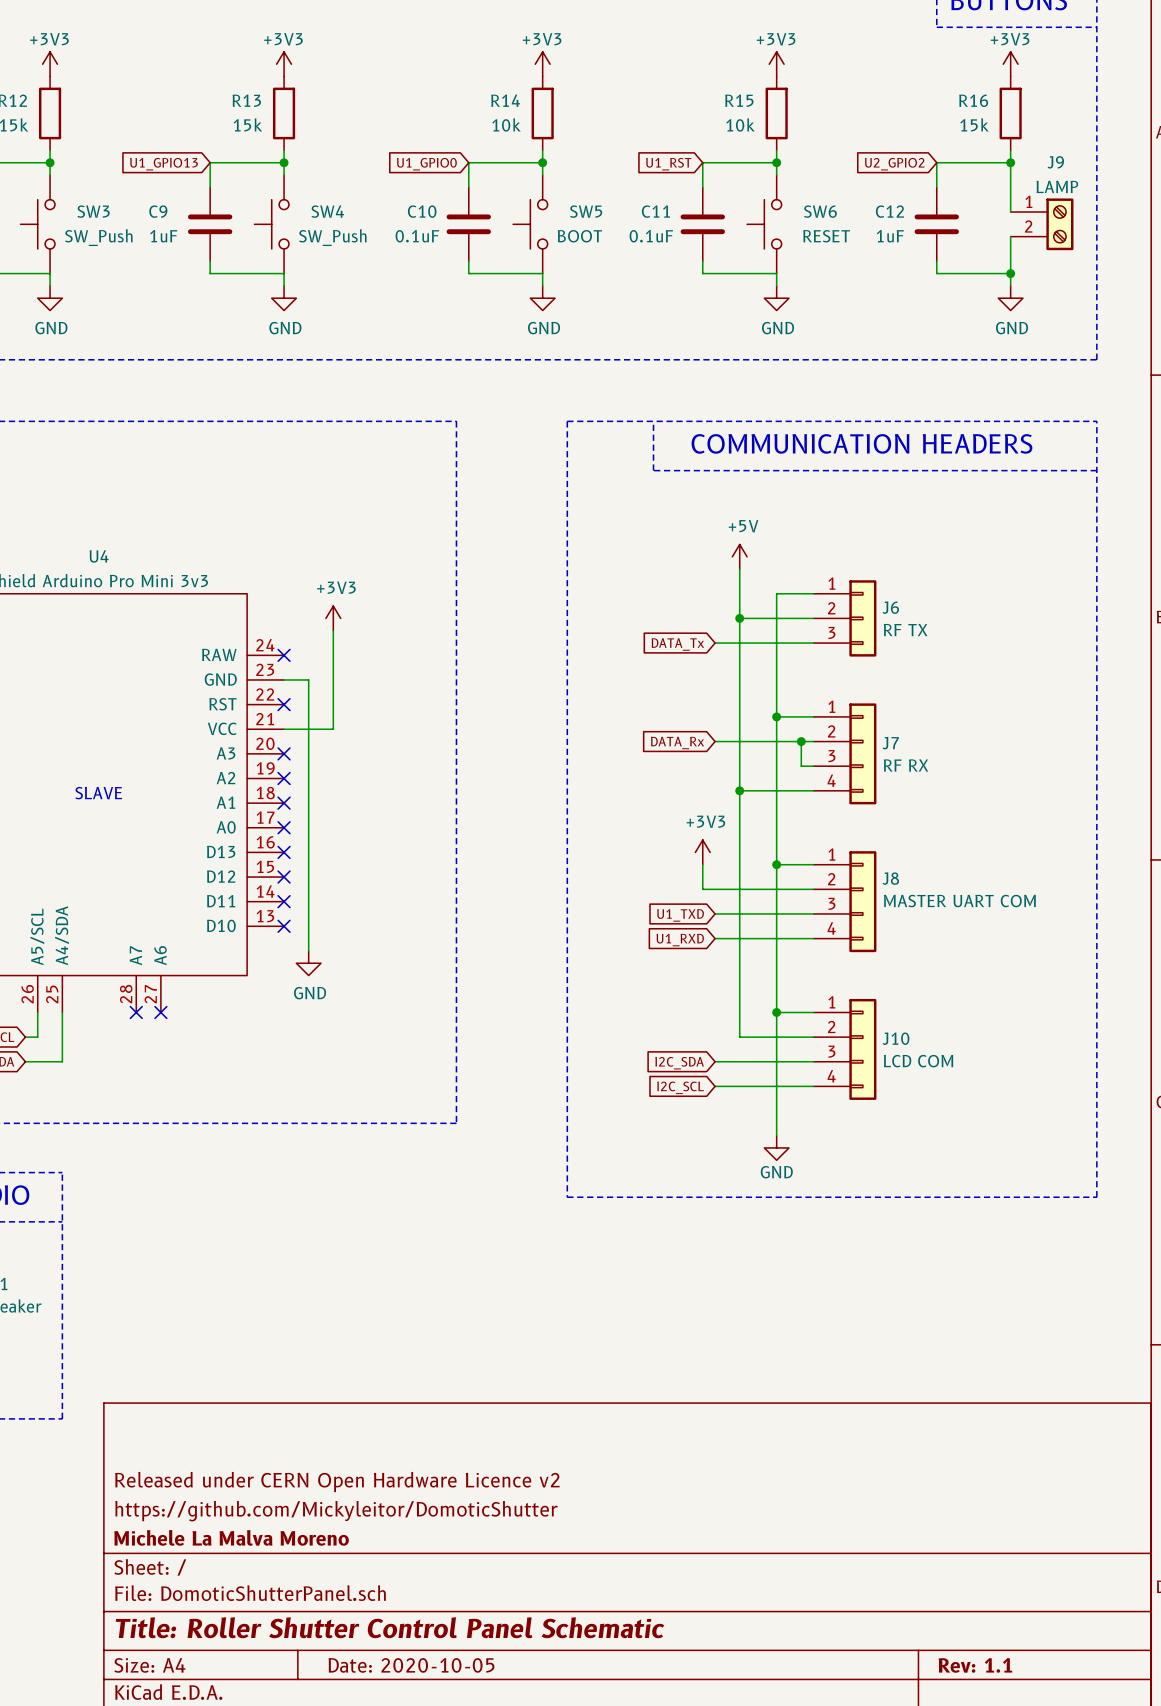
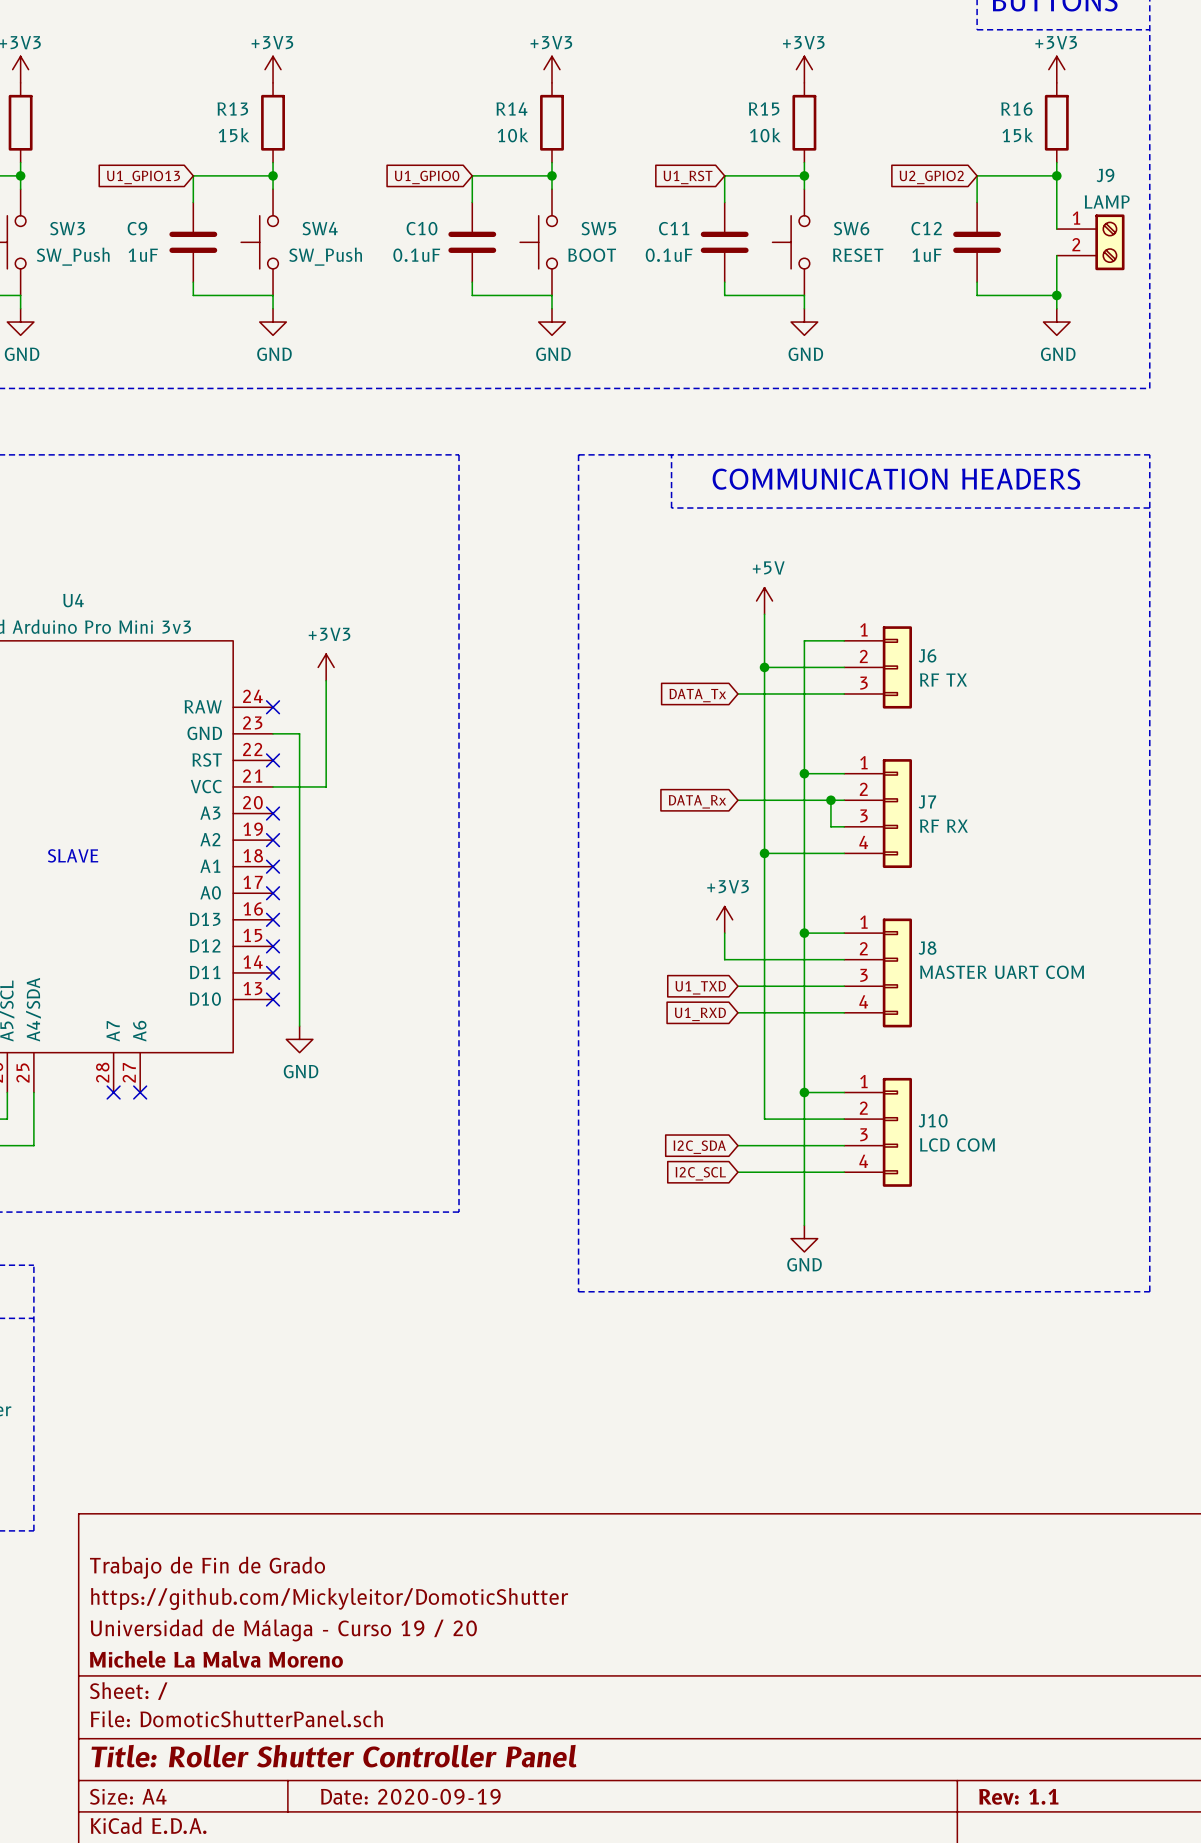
title block: none -> Trabajo de Fin de Grado (207, 1567)
title block: Released under CERN Open Hardware Licence v2 (337, 1482) -> https://github.com/Mickyleitor/DomoticShutter (329, 1599)
title block: https://github.com/Mickyleitor/DomoticShutter (336, 1511) -> Universidad de Málaga - Curso 19 / 20 (283, 1630)
title block: Title: Roller Shutter Control Panel Schematic (390, 1627) -> Title: Roller Shutter Controller Panel (333, 1756)
title block: Date: 2020-10-05 (411, 1665) -> Date: 2020-09-19 (410, 1796)

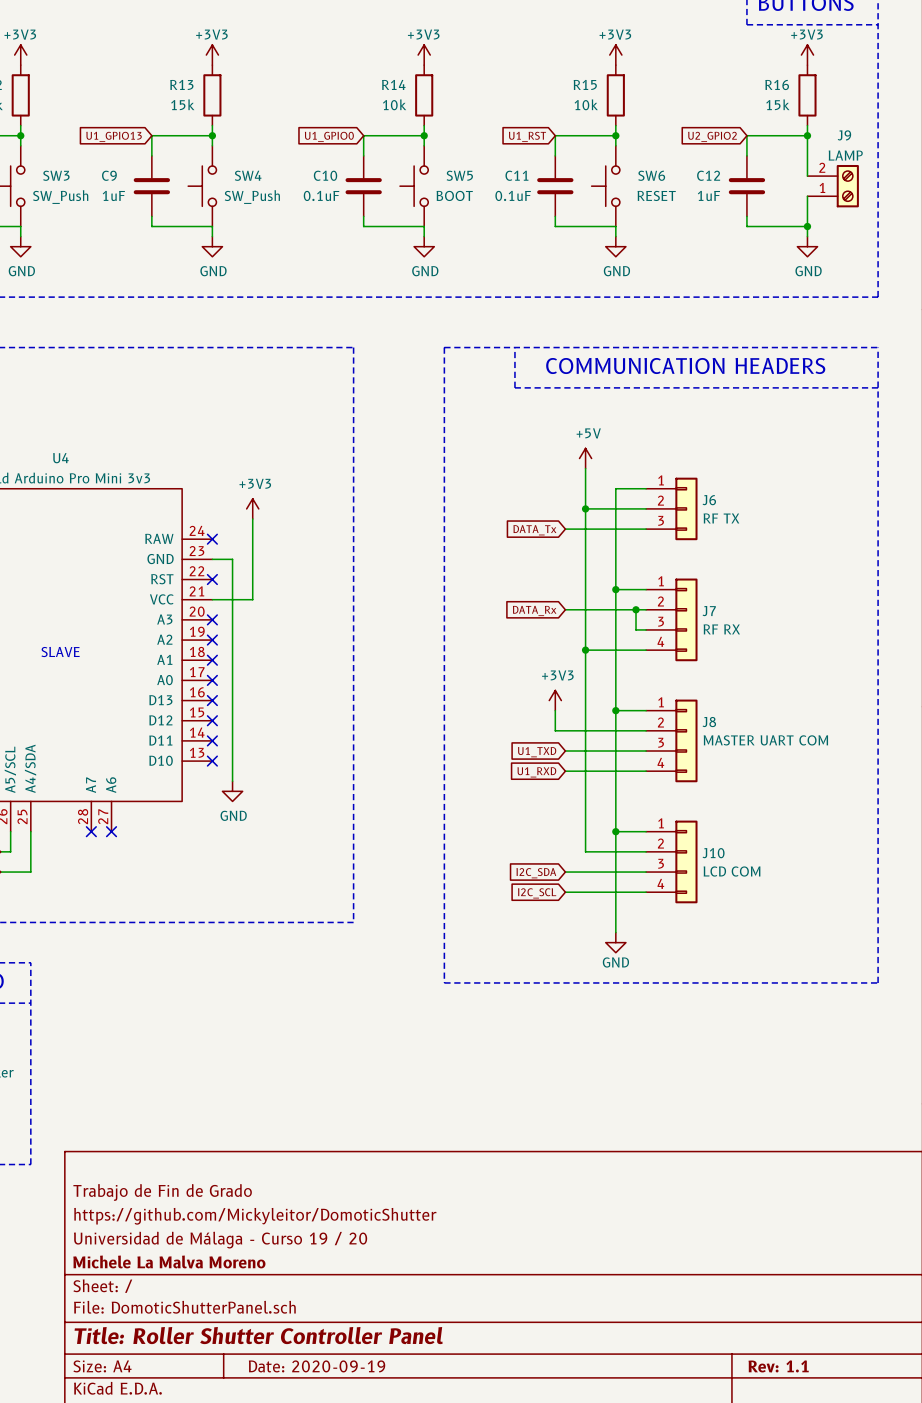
J9 flip: as is (1109, 242) -> up-down (847, 186)

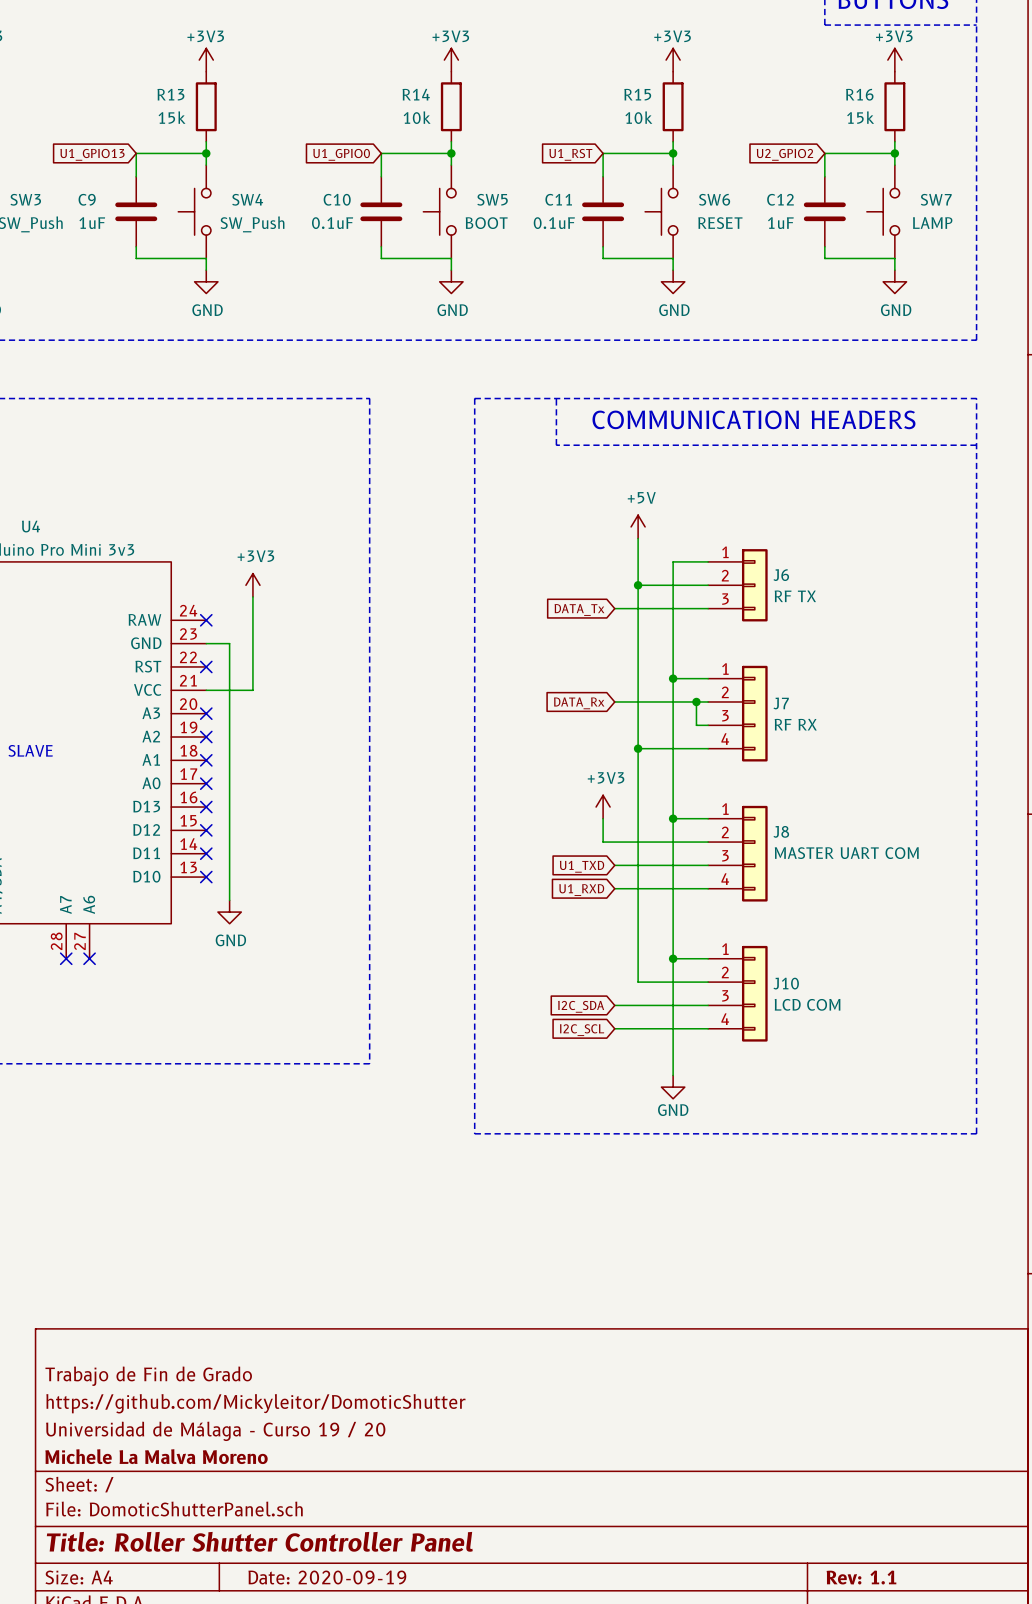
SW7: none -> LAMP (883, 211)
J9: LAMP (833, 186) -> none
junction: (807, 226) -> none

